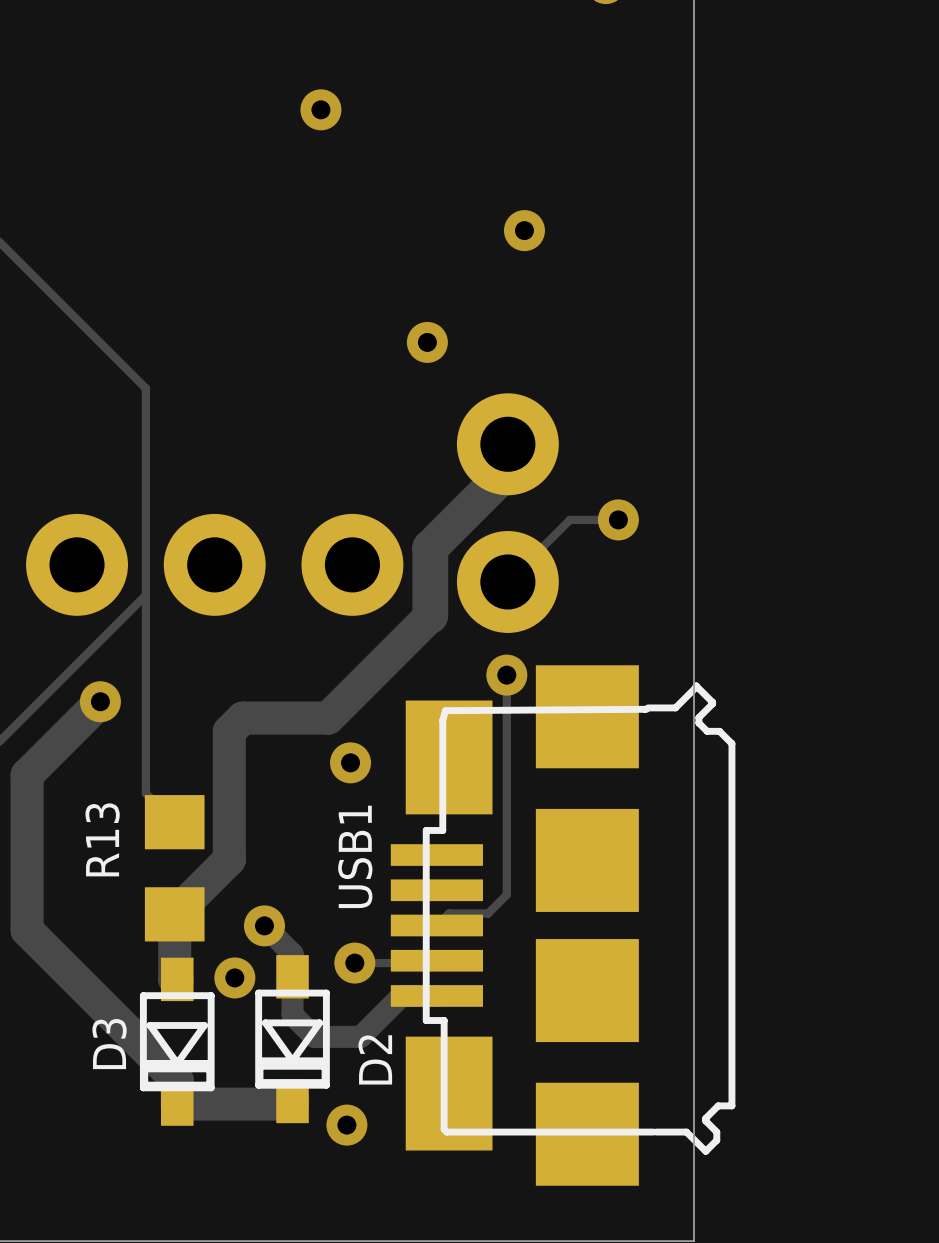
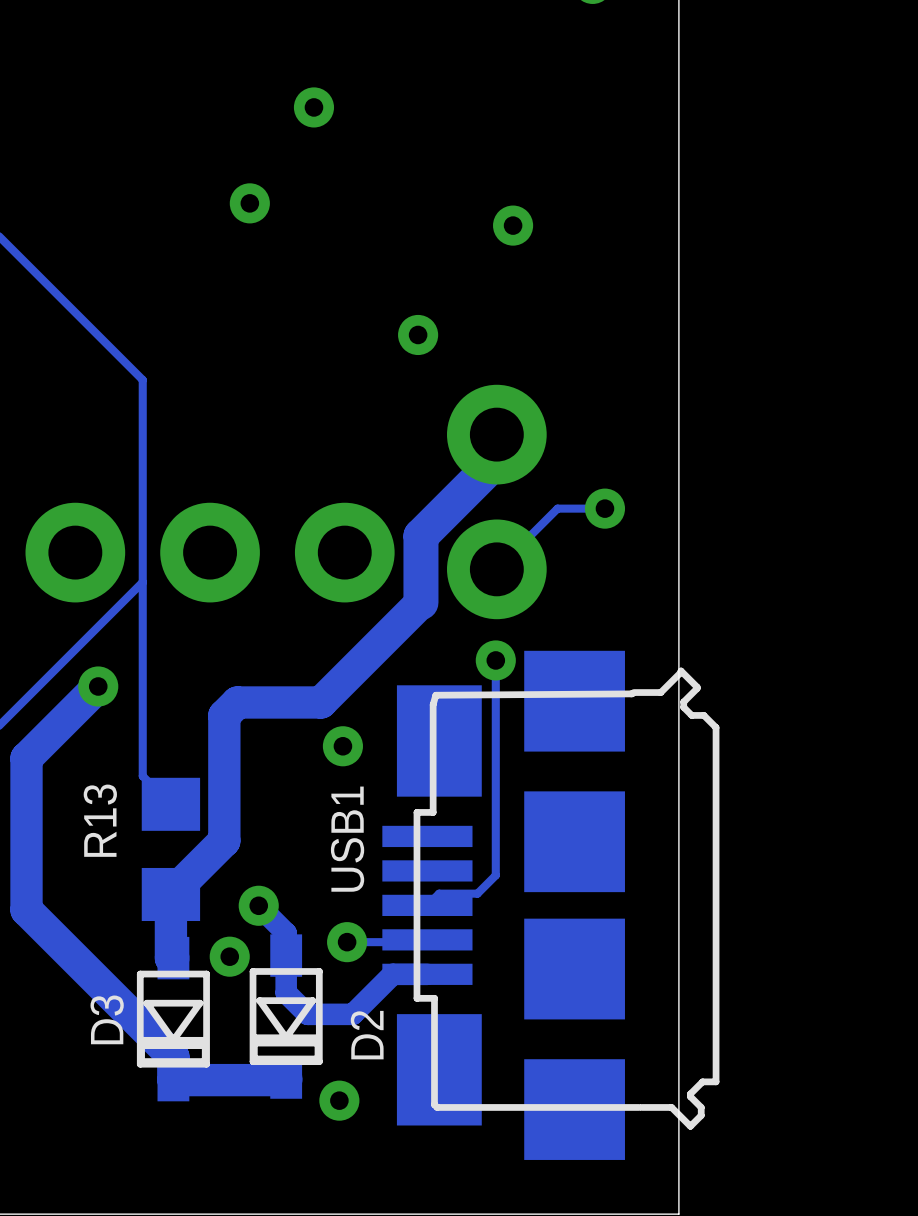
via: none -> (249, 203)

